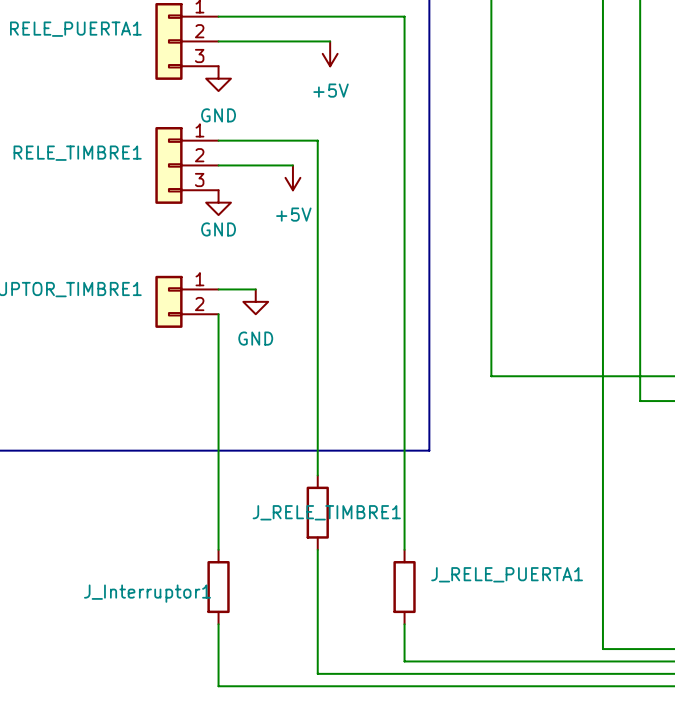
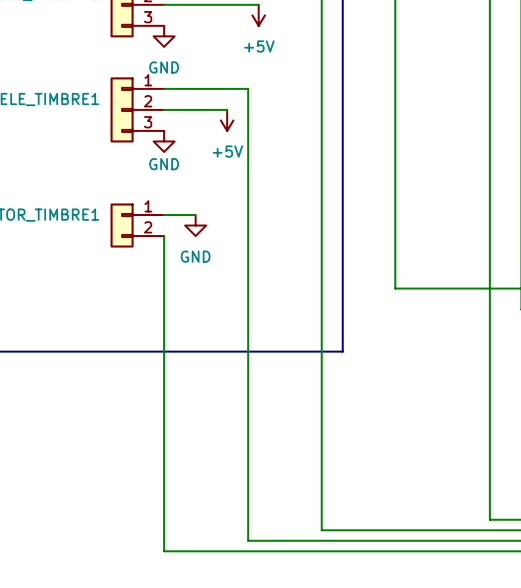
wire: none -> (248, 372) (248, 435)
J_RELE_TIMBRE1: (317, 512) -> none
wire: none -> (164, 435) (164, 498)
wire: none -> (321, 435) (321, 498)
J_Interruptor1: (218, 587) -> none
J_RELE_PUERTA1: (404, 587) -> none

